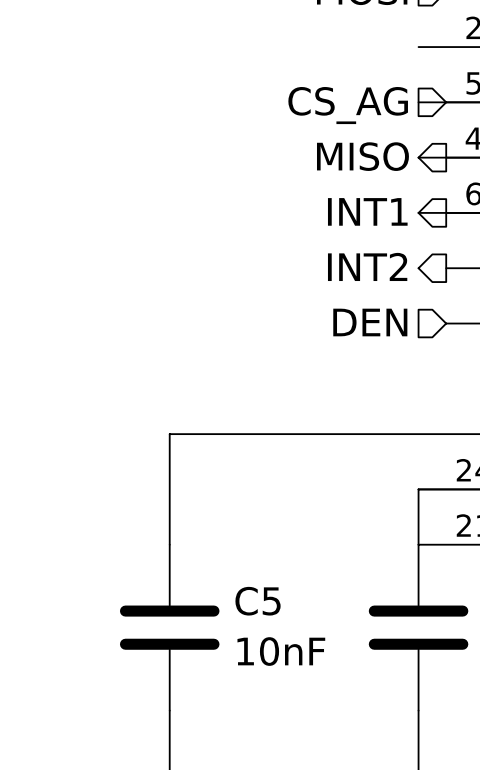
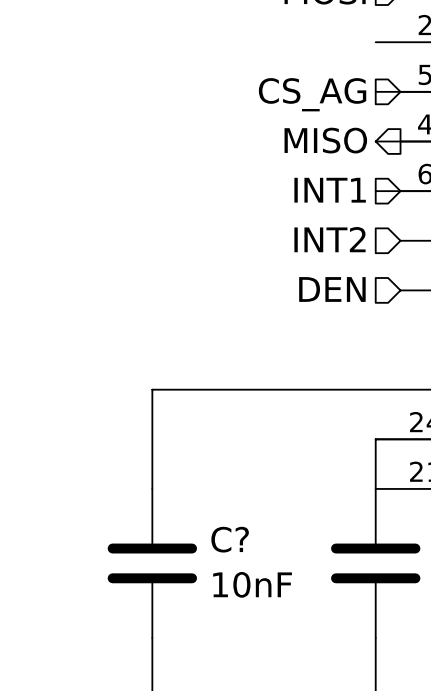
hierarchical label shape: output (367, 211) -> input (330, 190)
hierarchical label shape: output (367, 266) -> input (330, 239)
C5 name: C5 (258, 601) -> C? (230, 539)

